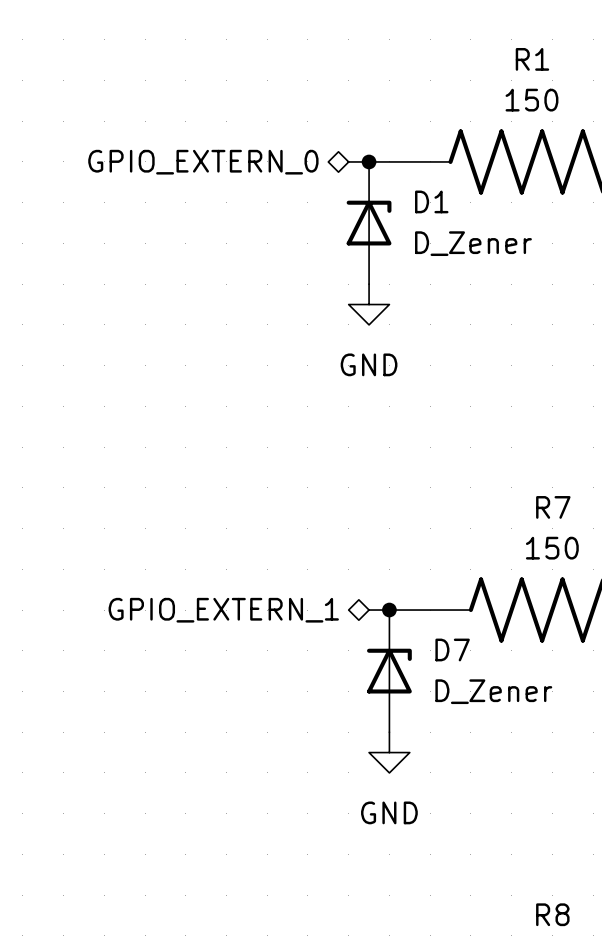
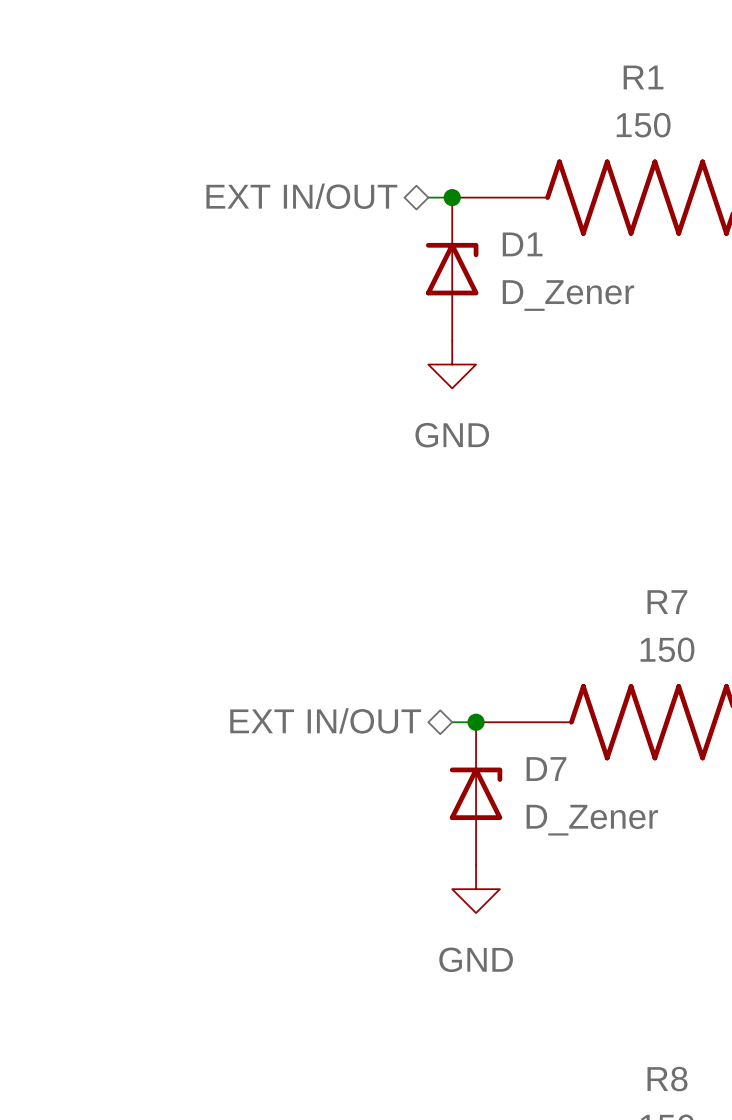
hierarchical label: GPIO_EXTERN_0 (203, 162) -> EXT IN/OUT (301, 196)
hierarchical label: GPIO_EXTERN_1 (223, 610) -> EXT IN/OUT (325, 720)

